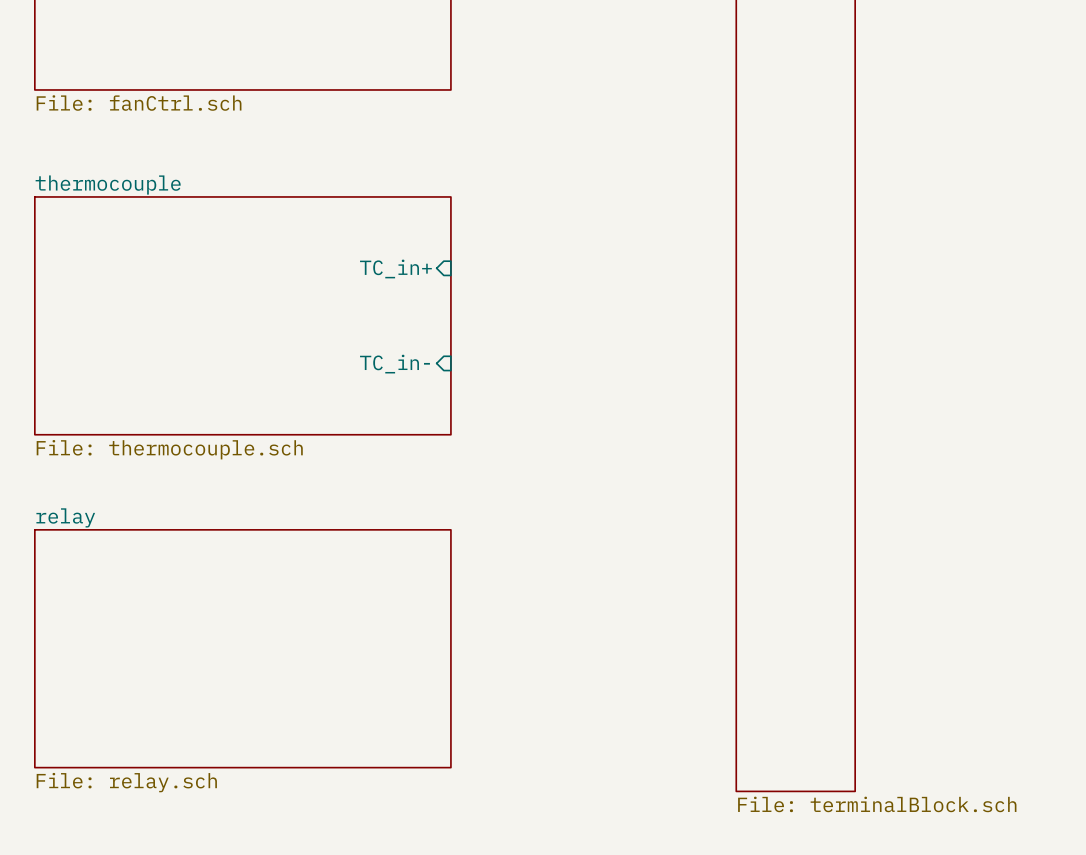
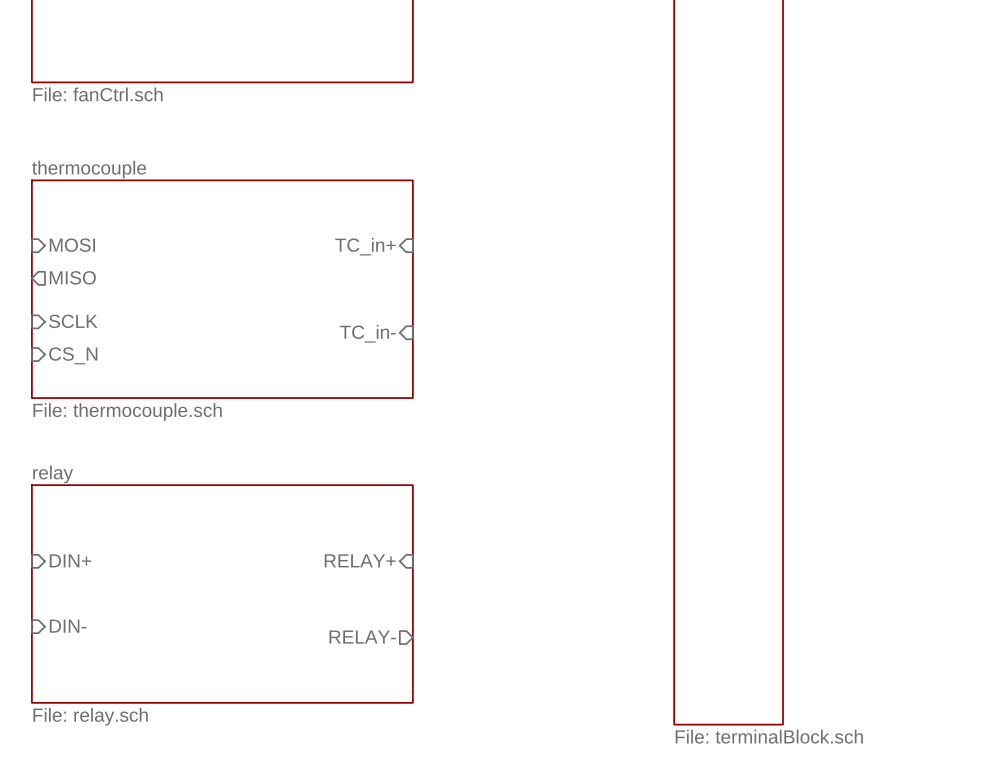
sheet pin: none -> MOSI (72, 245)
sheet pin: none -> MISO (72, 277)
sheet pin: none -> SCLK (73, 321)
sheet pin: none -> CS_N (73, 355)
sheet pin: none -> DIN+ (70, 560)
sheet pin: none -> RELAY+ (360, 560)
sheet pin: none -> DIN- (68, 626)
sheet pin: none -> RELAY- (362, 637)

